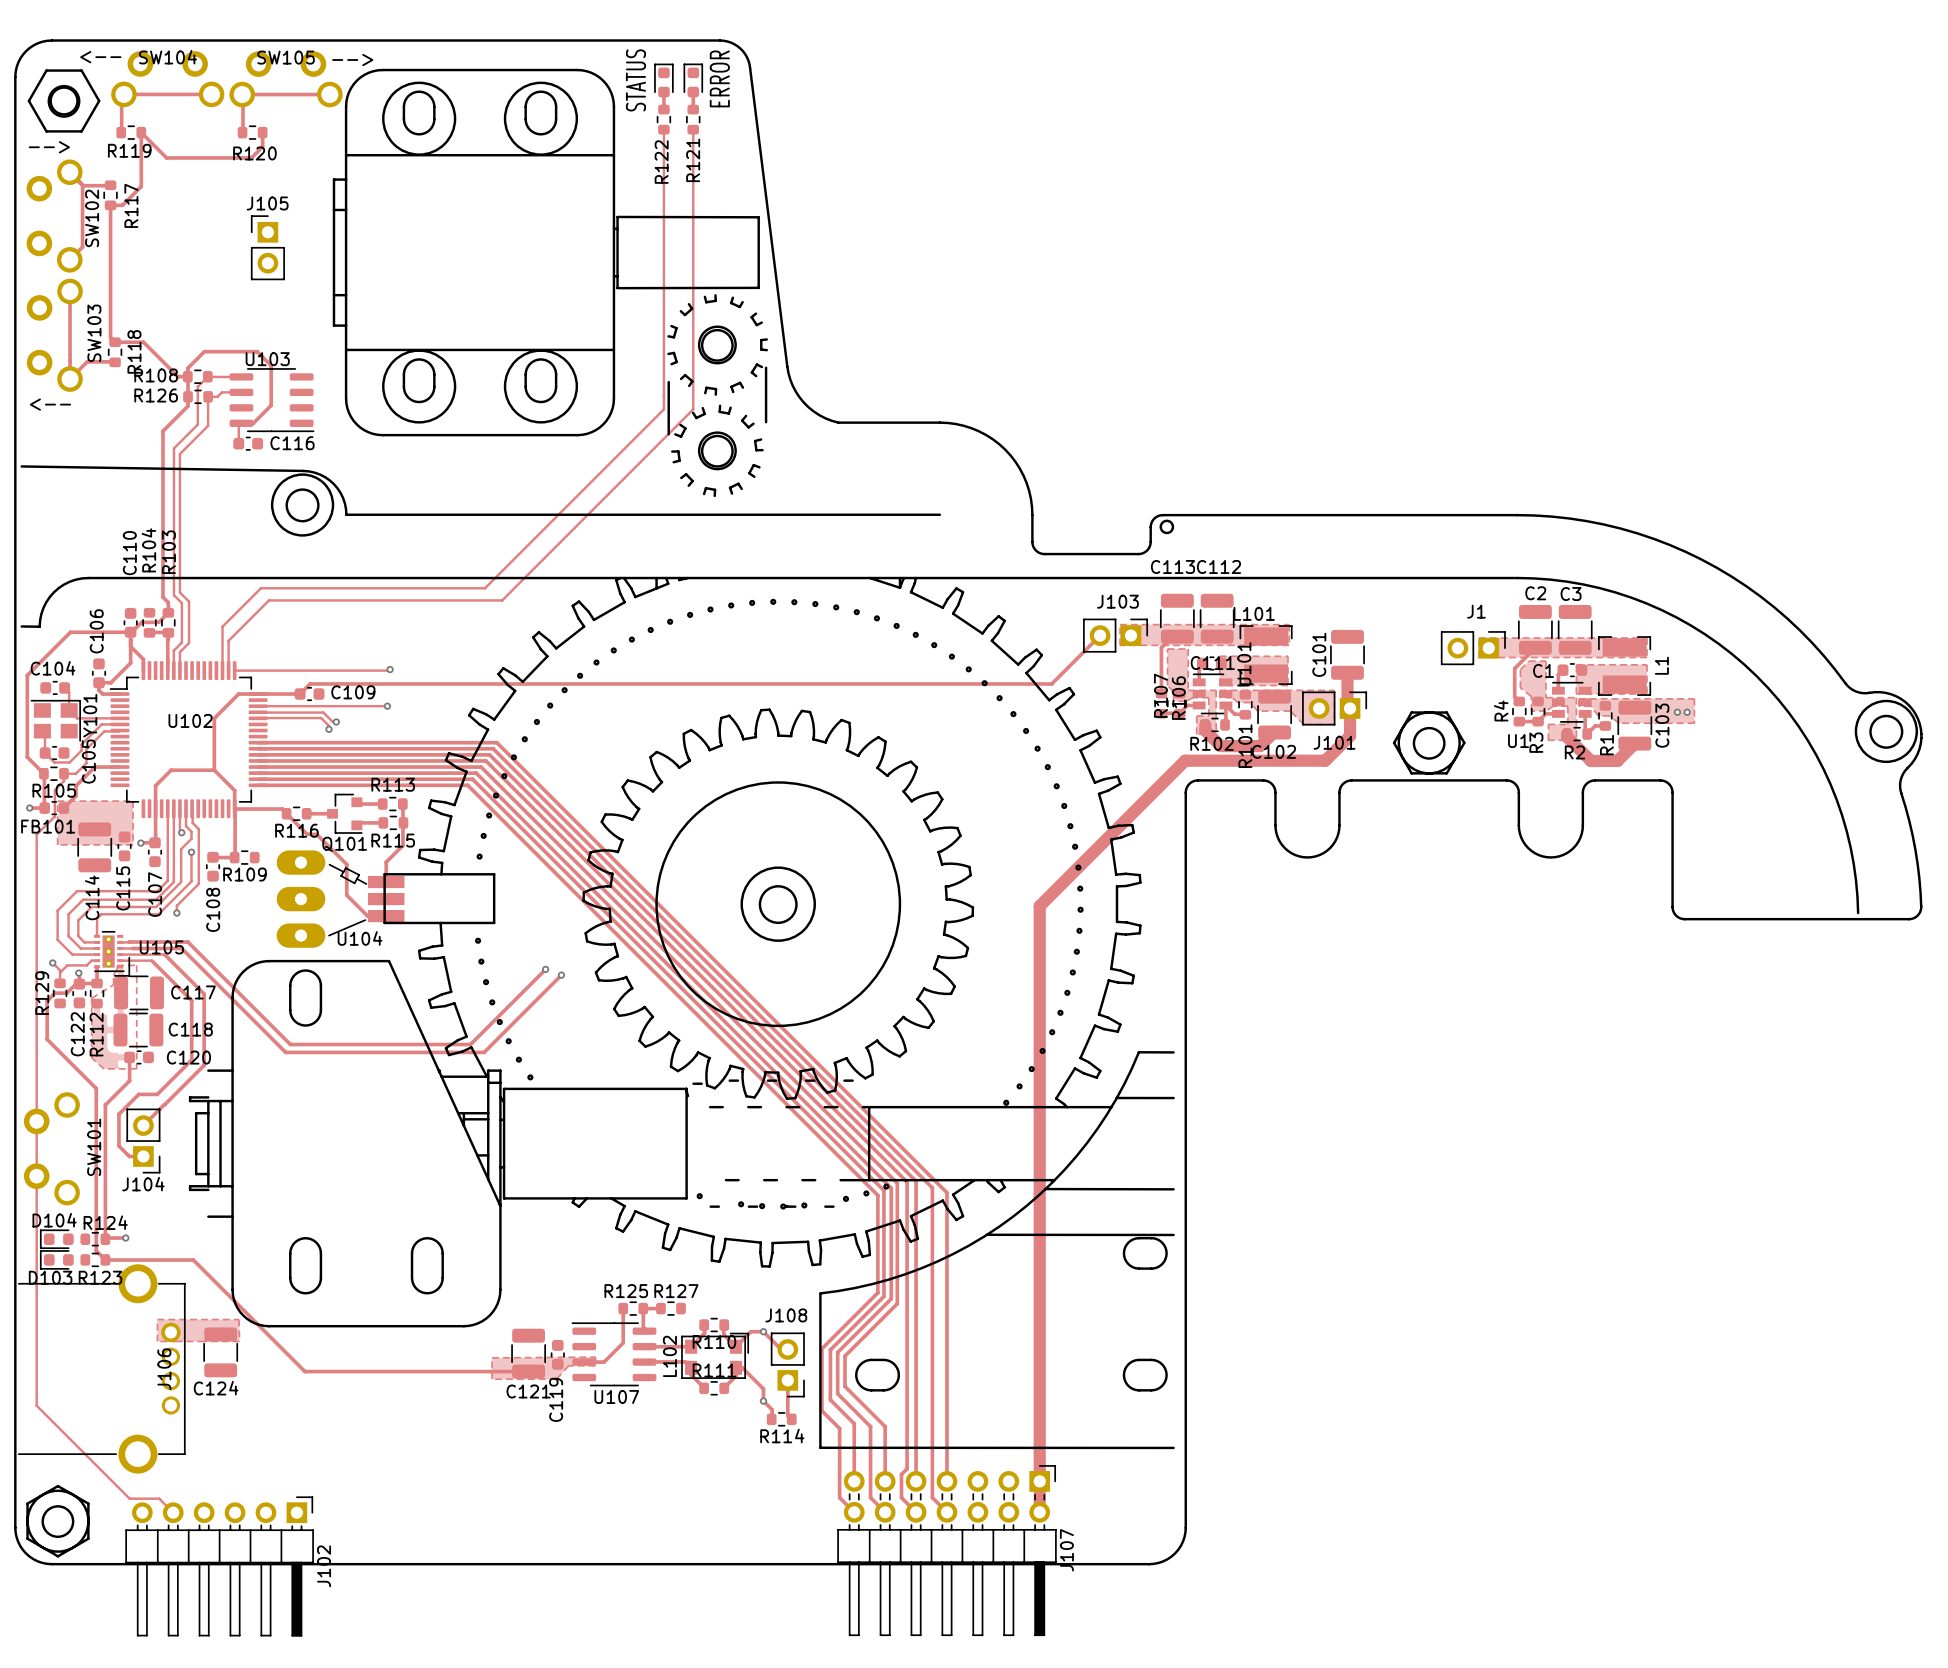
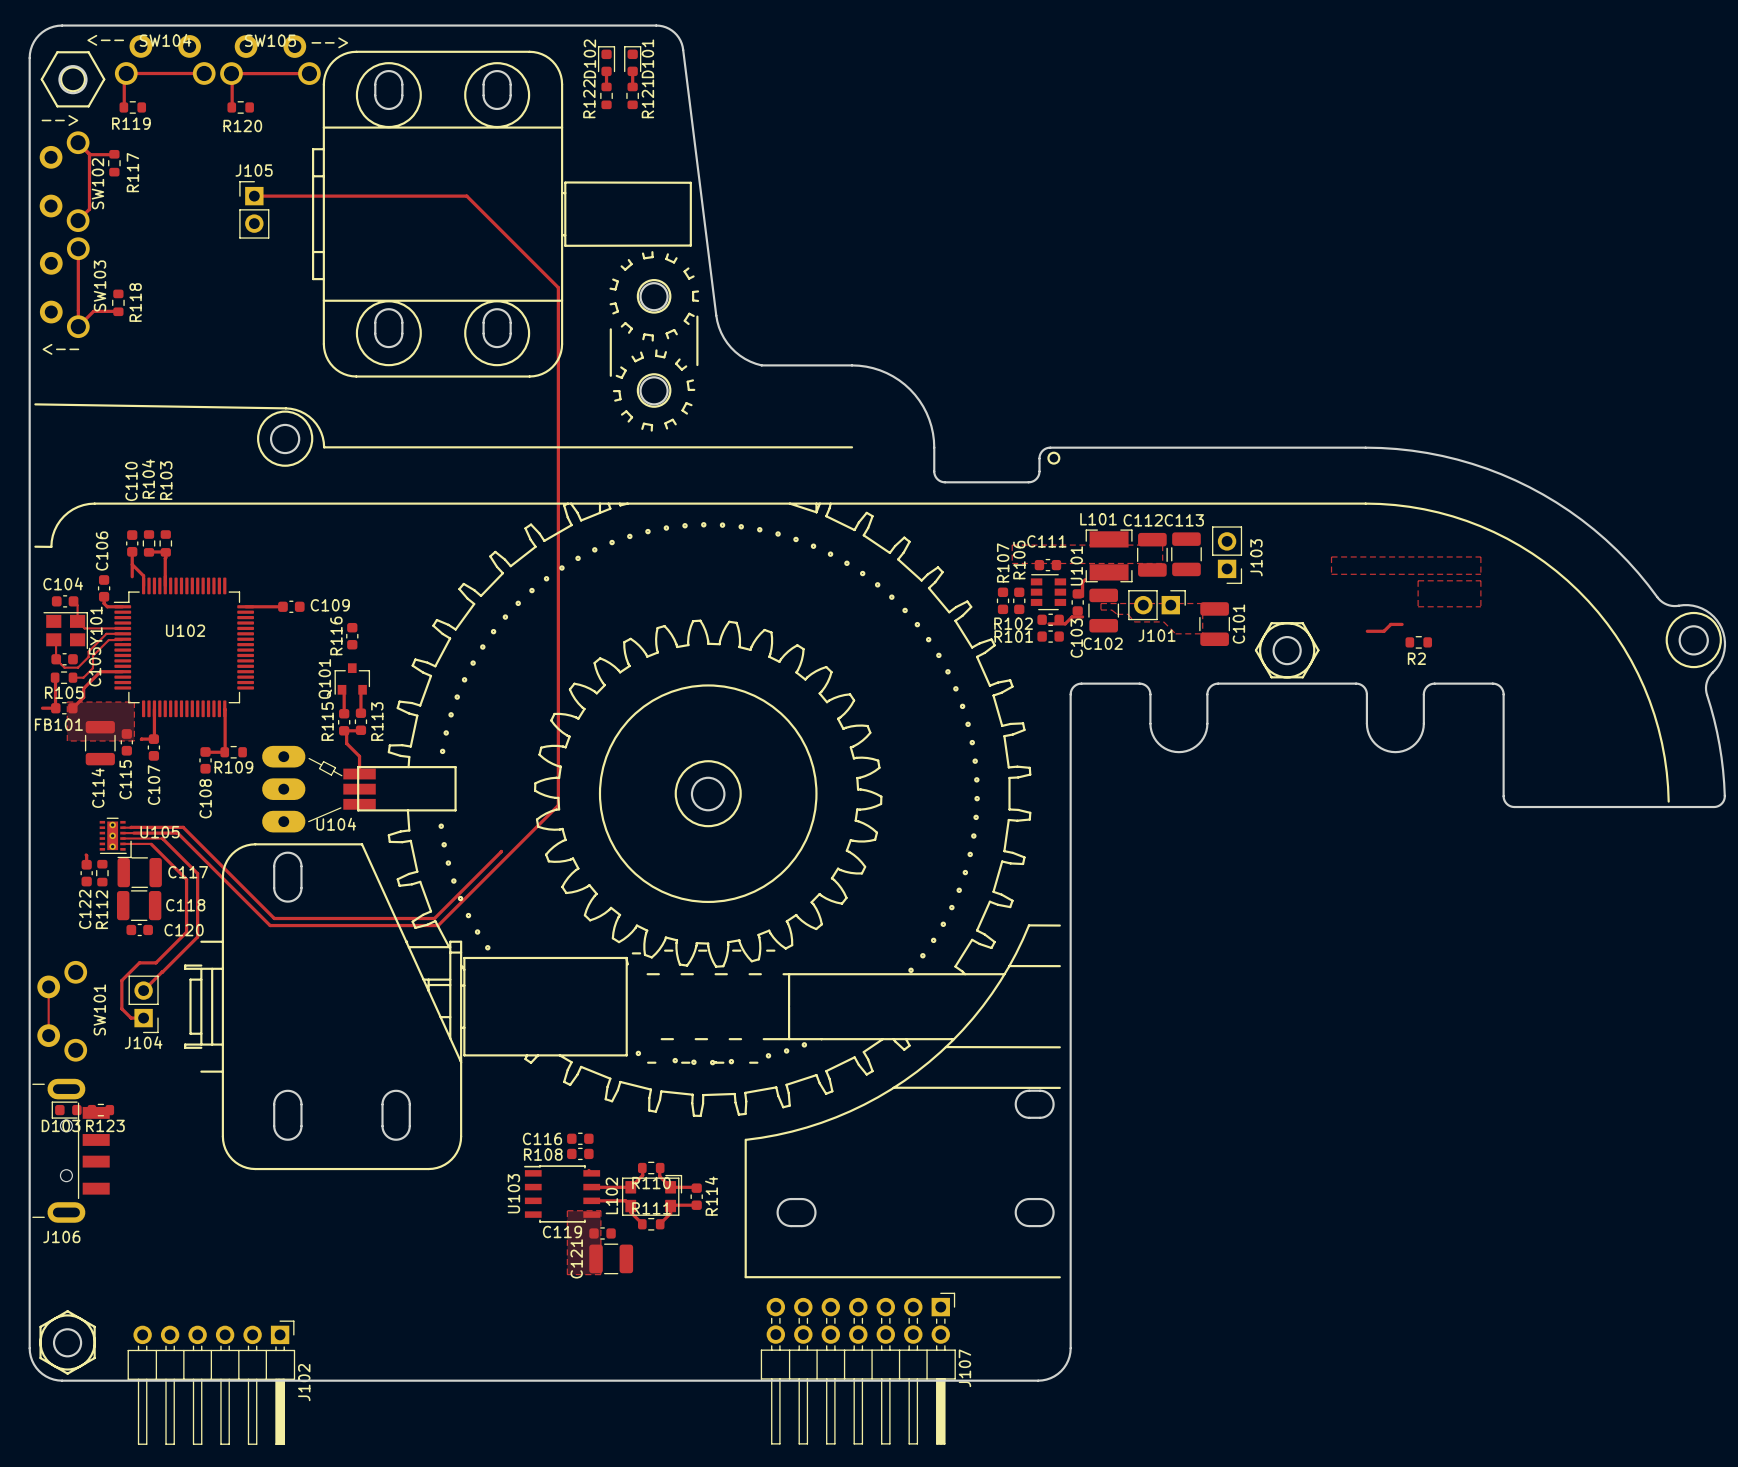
D102 name: none -> D102 (589, 58)
D101 name: none -> D101 (647, 58)
text: ERROR (719, 78) -> none
text: STATUS (635, 80) -> none
track: (663, 129) (663, 409) (485, 588) (260, 588) (222, 626) (222, 670) -> none
track: (693, 129) (693, 409) (502, 600) (269, 600) (228, 640) (228, 670) -> none
track: (262, 132) (262, 146) (251, 157) (166, 157) (141, 132) (141, 186) (122, 205) (110, 205) (110, 337) (115, 342) (143, 342) (178, 376) (187, 376) -> none
R121 name position: R121 (693, 160) -> R121 (647, 98)
R122 name position: R122 (661, 162) -> R122 (589, 98)
U103 name position: U103 (267, 359) -> U103 (513, 1193)
U103 footprint: [229, 368, 315, 433] -> [524, 1165, 601, 1223]
R108 footprint: [182, 369, 213, 384] -> [567, 1147, 594, 1161]
track: (187, 376) (188, 406) (163, 431) (163, 597) (168, 602) (168, 612) (158, 622) (141, 622) (131, 632) (70, 632) (27, 675) (27, 757) (43, 773) -> none
track: (187, 376) (187, 368) (204, 351) (257, 351) (271, 365) (271, 405) (253, 423) (241, 423) (238, 425) (238, 443) -> none
track: (241, 376) (207, 376) (197, 386) (197, 424) (173, 448) (173, 595) (181, 603) (181, 642) (173, 650) (173, 670) -> none
track: (241, 392) (221, 392) (217, 396) (208, 396) (208, 425) (179, 454) (179, 592) (189, 601) (189, 643) (179, 652) (179, 670) -> none
R126: (198, 396) -> none
C116 footprint: [233, 436, 264, 451] -> [567, 1132, 594, 1145]
C116 name position: C116 (292, 443) -> C116 (542, 1138)
C113 footprint: [1160, 593, 1195, 644] -> [1171, 532, 1202, 577]
C112 footprint: [1199, 593, 1235, 644] -> [1137, 532, 1168, 577]
C101 footprint: [1330, 629, 1365, 680] -> [1199, 602, 1230, 647]
C2: (1535, 629) -> none
C3: (1575, 629) -> none
track: (1100, 635) (1051, 683) (310, 683) (300, 694) -> none
J103 rotation: 0° (1115, 635) -> 90° clockwise (1227, 555)
J103 position: (1115, 635) -> (1227, 555)
track: (1177, 635) (1173, 635) (1161, 647) (1161, 694) -> none
track: (1535, 647) (1514, 668) (1514, 696) (1519, 701) -> none
zone outline: (1167, 648) (1167, 685) (1173, 691) (1173, 701) (1185, 701) (1193, 697) (1208, 697) (1208, 715) (1196, 715) (1196, 734) (1216, 734) (1216, 690) (1188, 690) (1188, 648) (1167, 648) -> none
J1: (1473, 648) -> none
C101 name position: C101 (1319, 654) -> C101 (1238, 624)
L101 position: (1266, 655) -> (1109, 555)
C111 footprint: [1197, 656, 1227, 671] -> [1034, 558, 1062, 572]
zone outline: (1219, 656) (1219, 685) (1287, 685) (1287, 656) (1219, 656) -> none
track: (130, 660) (130, 662) (110, 682) (99, 682) -> none
zone outline: (1528, 661) (1520, 669) (1520, 687) (1531, 696) (1531, 711) (1545, 711) (1553, 706) (1567, 706) (1567, 724) (1548, 724) (1548, 740) (1576, 740) (1576, 697) (1545, 697) (1545, 661) (1528, 661) -> none
C111 name position: C111 (1212, 663) -> C111 (1046, 541)
L1: (1624, 666) -> none
track: (390, 669) (234, 670) -> none
via: (390, 669) -> none
track: (1562, 670) (1558, 674) (1558, 690) -> none
C1: (1572, 670) -> none
track: (1347, 671) (1350, 736) (1325, 760) (1185, 760) (1039, 906) (1039, 1512) -> none
R107 footprint: [1154, 688, 1169, 719] -> [996, 587, 1010, 615]
R106 footprint: [1172, 688, 1187, 719] -> [1013, 587, 1026, 615]
R101 footprint: [1238, 689, 1253, 720] -> [1037, 630, 1064, 643]
C102 footprint: [1257, 689, 1292, 740] -> [1088, 588, 1120, 633]
U101 position: (1212, 693) -> (1048, 592)
track: (258, 694) (238, 694) (214, 718) (214, 770) -> none
R107 name position: R107 (1160, 695) -> R107 (1003, 562)
R106 name position: R106 (1178, 698) -> R106 (1019, 559)
zone outline: (1578, 698) (1578, 706) (1591, 706) (1598, 715) (1609, 715) (1619, 723) (1694, 723) (1694, 698) (1578, 698) -> none
C103 footprint: [1617, 700, 1653, 751] -> [1071, 589, 1084, 616]
U1: (1571, 702) -> none
track: (258, 706) (387, 706) -> none
via: (387, 706) -> none
J101 position: (1334, 708) -> (1157, 605)
R4: (1519, 711) -> none
R3: (1538, 711) -> none
track: (258, 712) (323, 712) (332, 722) (336, 722) -> none
via: (1677, 712) -> none
via: (1687, 712) -> none
track: (1585, 713) (1585, 732) (1587, 734) (1595, 725) (1605, 725) -> none
track: (1245, 714) (1234, 714) (1225, 705) (1224, 724) -> none
R1: (1605, 715) -> none
R102 footprint: [1200, 717, 1230, 733] -> [1037, 613, 1064, 626]
track: (258, 718) (321, 718) (329, 725) (329, 729) -> none
via: (336, 722) -> none
track: (1205, 724) (1205, 730) (1220, 746) (1260, 746) (1274, 731) -> none
C103 name position: C103 (1662, 725) -> C103 (1076, 638)
via: (329, 729) -> none
track: (1567, 734) (1567, 737) (1591, 760) (1617, 760) (1634, 743) -> none
track: (258, 742) (496, 742) (946, 1192) (946, 1481) -> none
R102 name position: R102 (1212, 743) -> R102 (1013, 623)
R101 name position: R101 (1245, 746) -> R101 (1013, 636)
track: (258, 748) (493, 748) (932, 1187) (932, 1497) (946, 1512) -> none
track: (258, 754) (489, 754) (916, 1181) (916, 1481) -> none
track: (258, 760) (486, 760) (907, 1182) (907, 1468) (901, 1474) (901, 1497) (916, 1512) -> none
track: (258, 767) (481, 767) (897, 1183) (897, 1303) (845, 1356) (845, 1386) (885, 1426) (885, 1481) -> none
track: (214, 770) (234, 790) (234, 808) -> none
track: (214, 770) (171, 770) (155, 785) (155, 808) -> none
track: (64, 773) (64, 781) (54, 790) (54, 816) (36, 834) (36, 1121) -> none
track: (258, 773) (476, 773) (891, 1188) (891, 1298) (837, 1352) (837, 1393) (870, 1426) (870, 1497) (885, 1512) -> none
track: (258, 779) (472, 779) (883, 1190) (883, 1296) (830, 1349) (830, 1399) (854, 1423) (854, 1481) -> none
R113 name position: R113 (393, 784) -> R113 (377, 721)
track: (258, 785) (467, 785) (877, 1195) (877, 1292) (821, 1348) (821, 1410) (839, 1428) (839, 1497) (854, 1512) -> none
track: none -> (342, 689) (344, 691) (344, 713)
track: none -> (362, 689) (360, 691) (360, 713)
R113 footprint: [377, 796, 408, 812] -> [354, 708, 368, 735]
track: (356, 802) (358, 804) (383, 804) -> none
track: (402, 804) (402, 845) (386, 862) -> (360, 730) (344, 730) (346, 733) (346, 743) (359, 756)
R116 footprint: [281, 806, 312, 821] -> [346, 622, 359, 650]
via: (29, 808) -> none
track: (192, 808) (192, 823) (198, 829) (198, 883) (176, 905) (176, 913) -> none
track: (167, 809) (167, 880) (157, 891) (77, 891) (57, 910) (57, 939) (72, 954) (97, 954) -> none
track: (173, 809) (173, 882) (156, 899) (83, 899) (68, 914) (68, 936) (80, 948) (97, 948) -> none
track: (179, 809) (179, 830) (181, 832) -> none
track: (186, 809) (186, 826) (191, 831) (191, 838) (181, 849) (181, 882) (156, 906) (91, 906) (78, 920) (78, 936) (84, 942) (97, 942) -> none
track: (234, 809) (282, 809) (287, 813) -> none
track: (286, 813) (307, 834) (316, 834) (346, 864) (346, 895) (367, 916) (386, 916) -> none
track: (306, 813) (332, 813) -> none
Q101 rotation: 0° (344, 813) -> 90° clockwise (352, 679)
Q101 position: (344, 813) -> (352, 679)
R115 footprint: [378, 815, 409, 830] -> [338, 709, 351, 736]
track: (383, 822) (359, 822) (356, 825) -> none
R116 name position: R116 (296, 830) -> R116 (336, 635)
via: (181, 832) -> none
R115 name position: R115 (393, 840) -> R115 (327, 721)
via: (140, 843) -> none
track: (191, 852) (191, 881) (158, 914) (101, 914) (97, 918) (97, 936) -> none
via: (191, 852) -> none
via: (176, 913) -> none
track: (97, 960) (91, 960) (86, 965) (67, 965) (60, 972) -> none
track: (52, 962) (60, 970) (60, 983) -> none
via: (52, 962) -> none
zone outline: (117, 965) (113, 975) (113, 984) (91, 998) (91, 1057) (103, 1068) (136, 1068) (136, 965) (117, 965) -> none
track: (97, 966) (97, 983) (75, 984) (66, 993) (55, 993) (47, 1001) (47, 1039) (96, 1088) (96, 1250) (105, 1260) (193, 1260) (304, 1371) (528, 1371) -> none
via: (545, 969) -> none
via: (78, 973) -> none
track: (561, 975) (484, 1052) (474, 1052) -> (254, 196) (466, 196) (558, 287) (558, 805) (438, 925)
via: (561, 975) -> none
R129: (60, 993) -> none
track: (129, 1057) (129, 1080) (105, 1105) (105, 1239) (125, 1238) -> none
track: (36, 1176) (36, 1405) (129, 1498) (159, 1498) (173, 1512) -> none
via: (125, 1238) -> none
D104: (56, 1239) -> none
R124: (95, 1239) -> none
J106 footprint: [18, 1264, 186, 1474] -> [32, 1078, 110, 1223]
track: (623, 1308) (623, 1342) (604, 1362) (584, 1362) -> none
R125: (633, 1308) -> none
track: (660, 1308) (643, 1308) (644, 1331) -> none
R127: (670, 1308) -> none
zone outline: (157, 1319) (157, 1341) (239, 1341) (238, 1319) (157, 1319) -> none
C121 footprint: [511, 1328, 546, 1379] -> [589, 1243, 634, 1275]
via: (763, 1331) -> none
C119 footprint: [550, 1339, 565, 1370] -> [589, 1227, 616, 1240]
track: (735, 1346) (750, 1331) (763, 1331) (781, 1349) (787, 1349) -> (670, 1187) (696, 1188)
C124: (220, 1352) -> none
U107: (614, 1354) -> none
zone outline: (595, 1357) (595, 1365) (568, 1365) (556, 1379) (492, 1379) (492, 1357) (595, 1357) -> none
J108: (787, 1364) -> none
track: none -> (671, 1205) (696, 1205)
track: (735, 1367) (742, 1367) (763, 1388) (763, 1401) (772, 1409) (772, 1419) -> none
J106 name position: J106 (164, 1369) -> J106 (61, 1236)
zone outline: none -> (567, 1210) (567, 1274) (600, 1274) (600, 1210) (567, 1210)
track: (787, 1380) (787, 1415) (791, 1419) -> none
C121 name position: C121 (528, 1391) -> C121 (576, 1258)
C119 name position: C119 (556, 1399) -> C119 (562, 1231)
via: (763, 1401) -> none
R114 footprint: [766, 1412, 797, 1427] -> [690, 1183, 703, 1210]
R114 name position: R114 (782, 1436) -> R114 (711, 1196)

